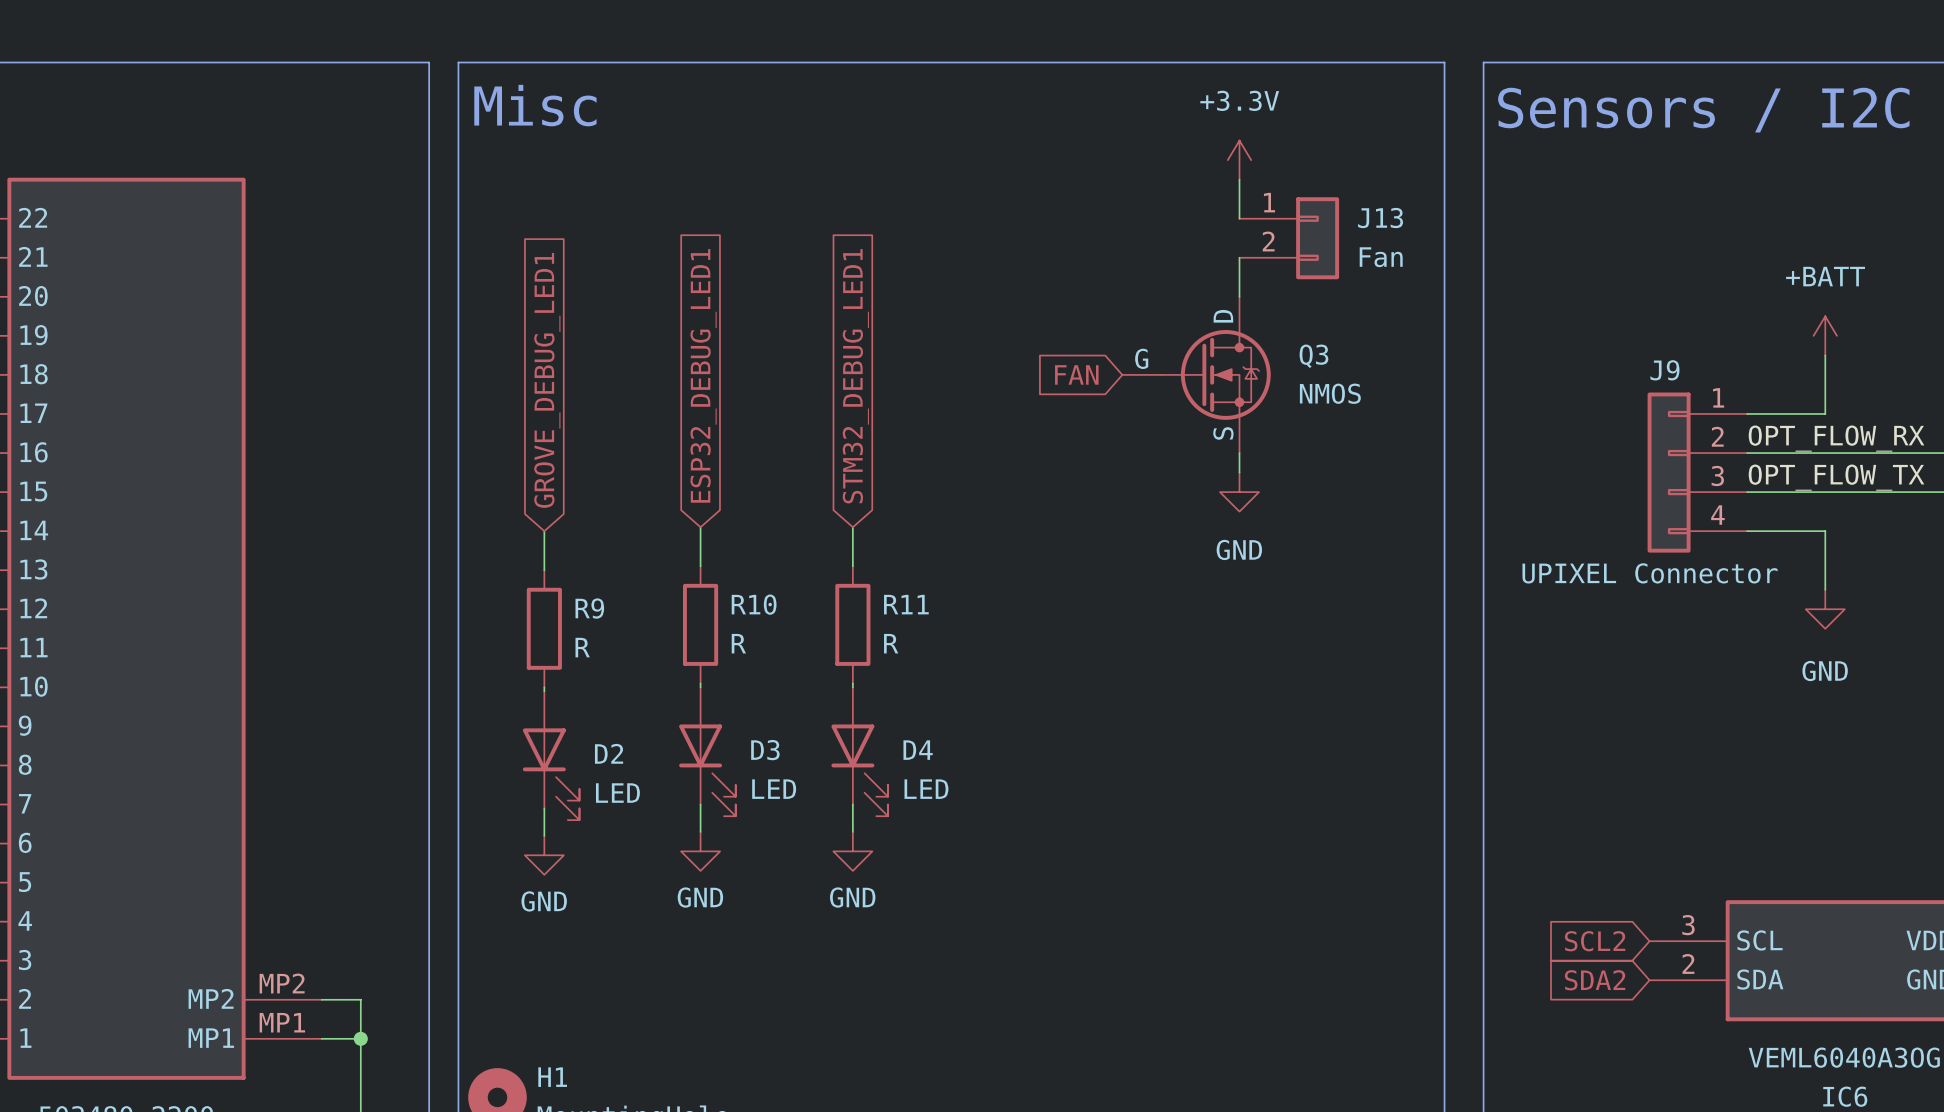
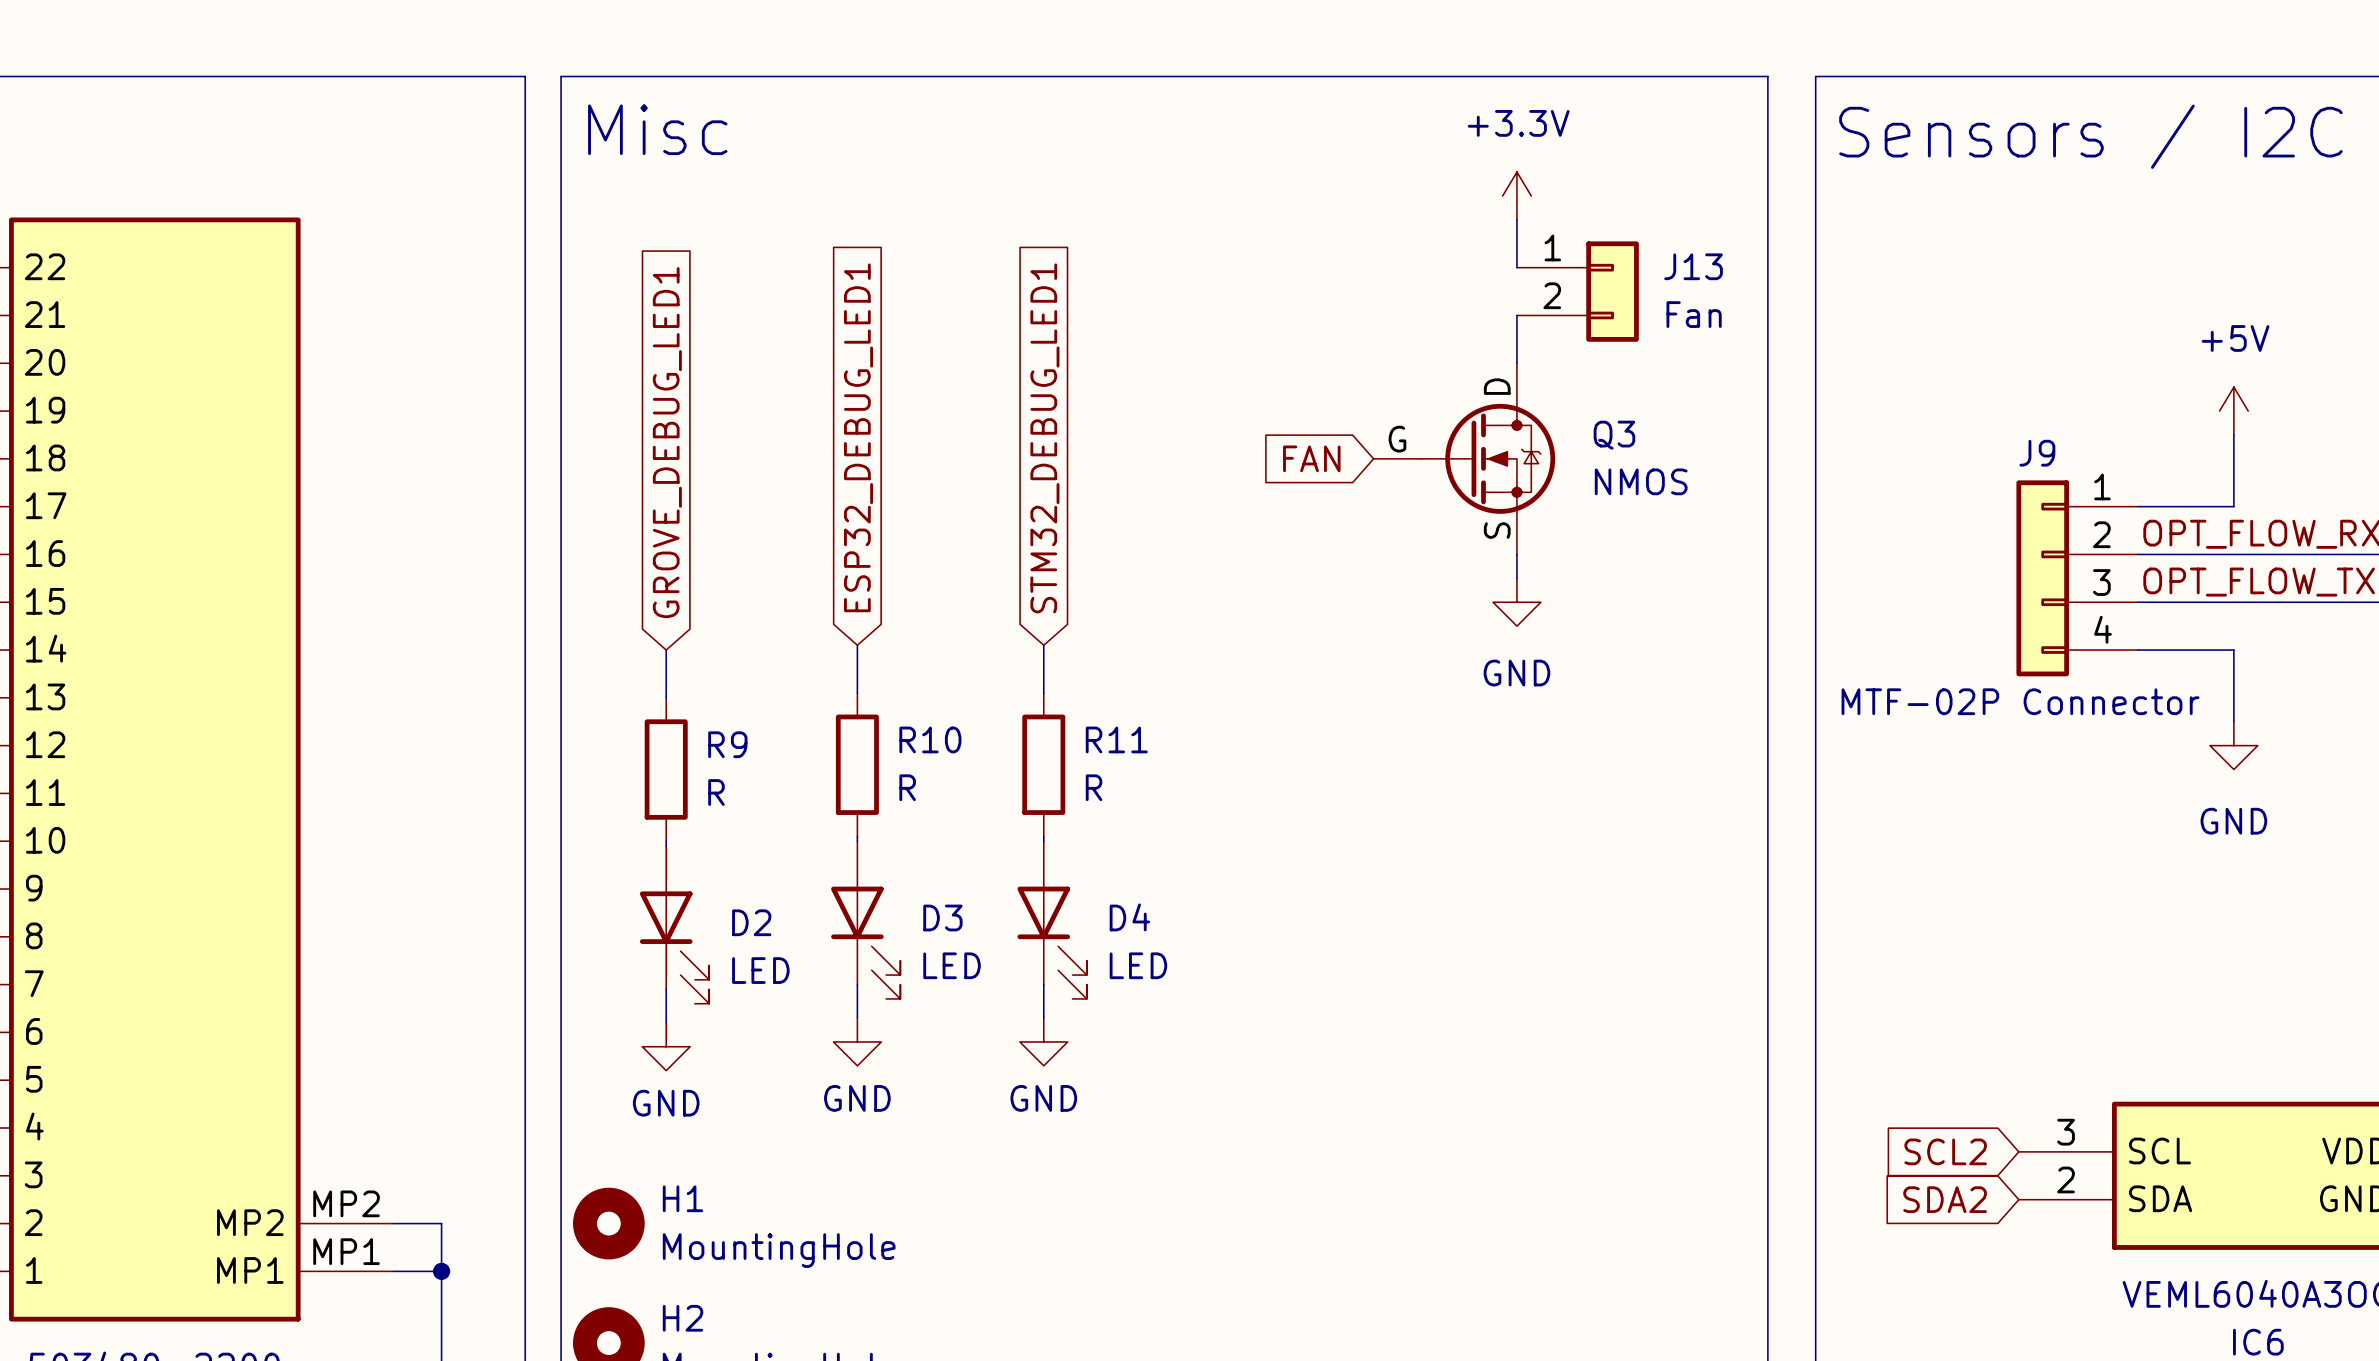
power symbol: +BATT (1825, 335) -> +5V (2233, 411)
J9 value: UPIXEL Connector (1650, 573) -> MTF-02P Connector (2020, 701)
H1: none -> MountingHole (608, 1223)
H1 name: H1 (552, 1077) -> H2 (683, 1318)

